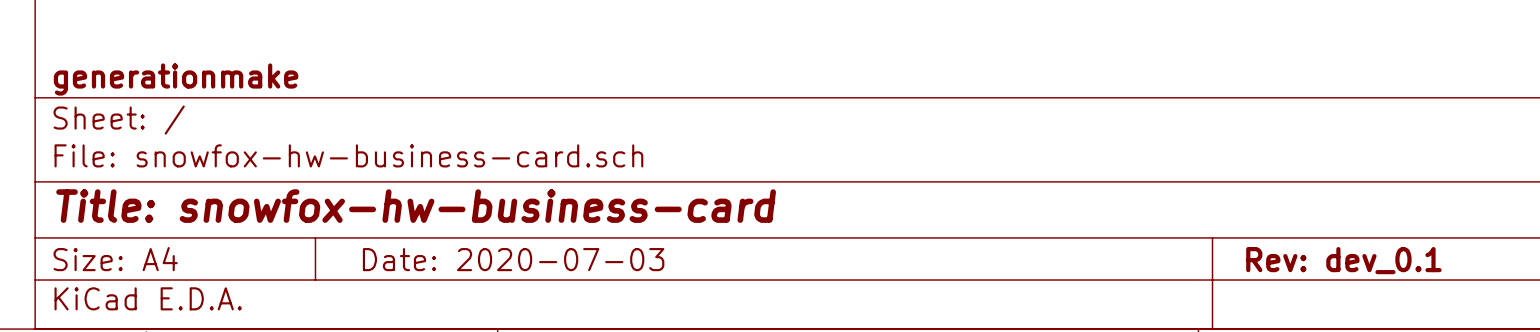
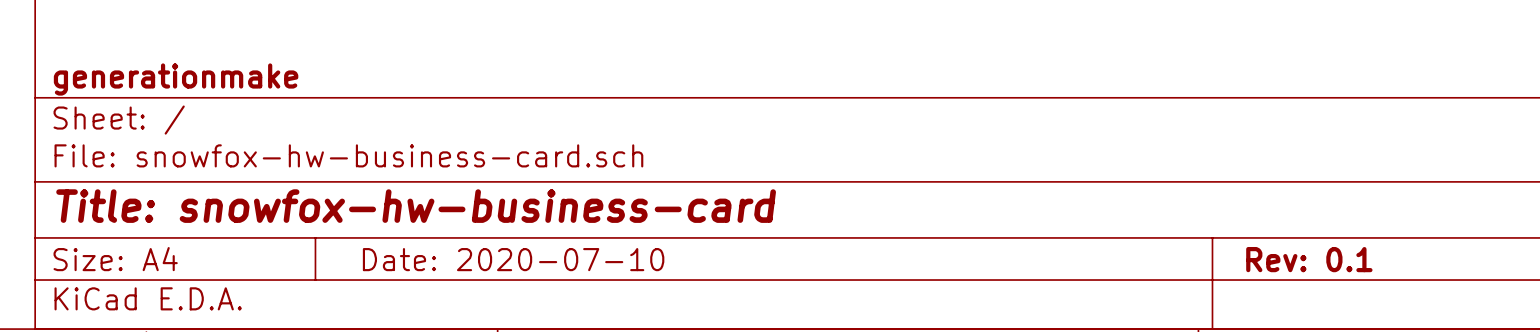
title block: Date: 2020-07-03 (513, 259) -> Date: 2020-07-10 (513, 259)
title block: Rev: dev_0.1 (1343, 260) -> Rev: 0.1 (1309, 259)

